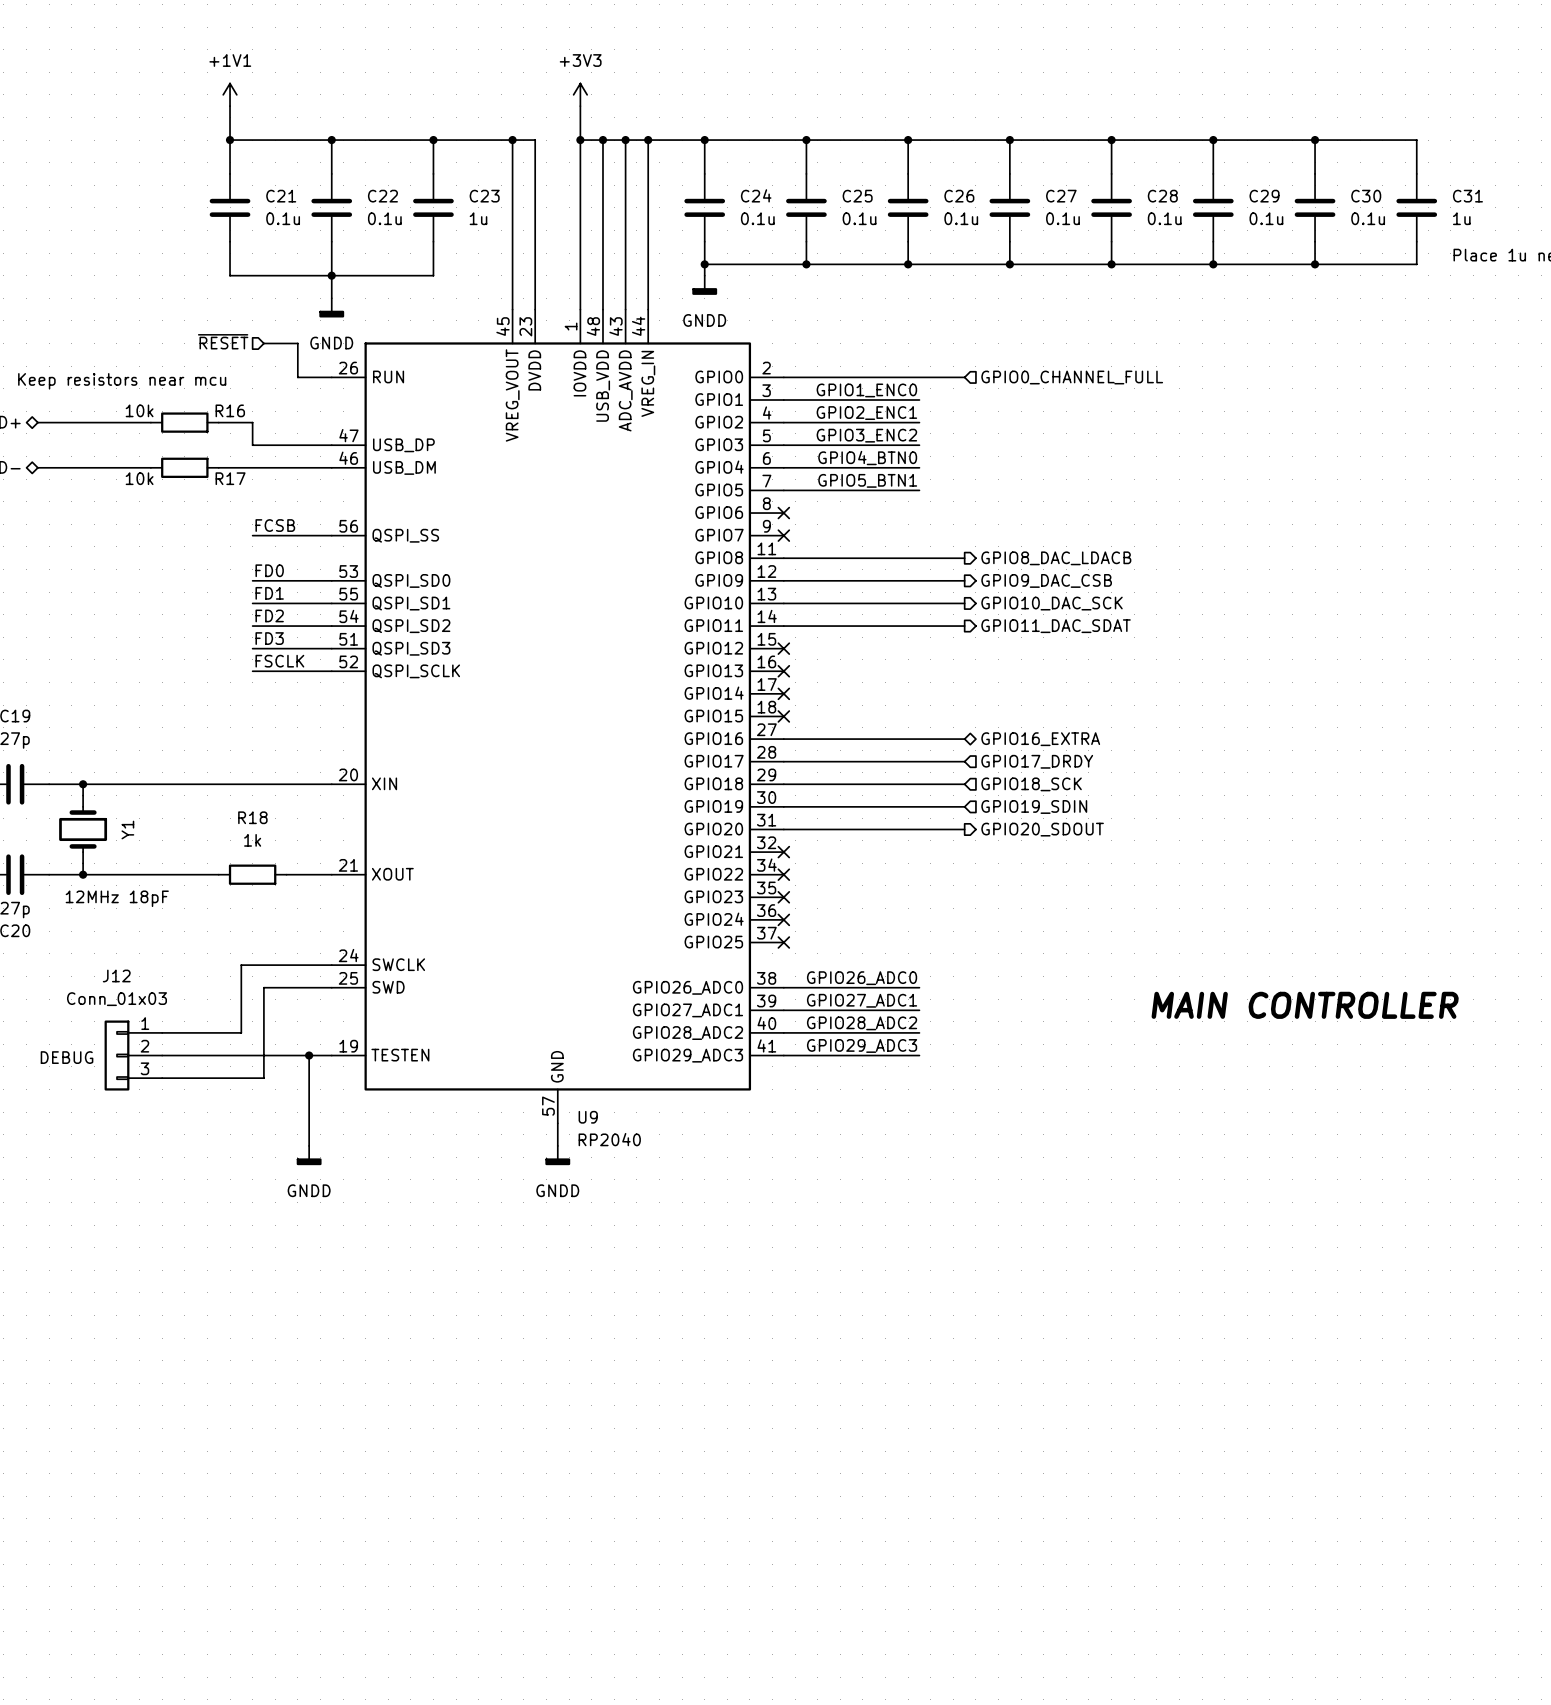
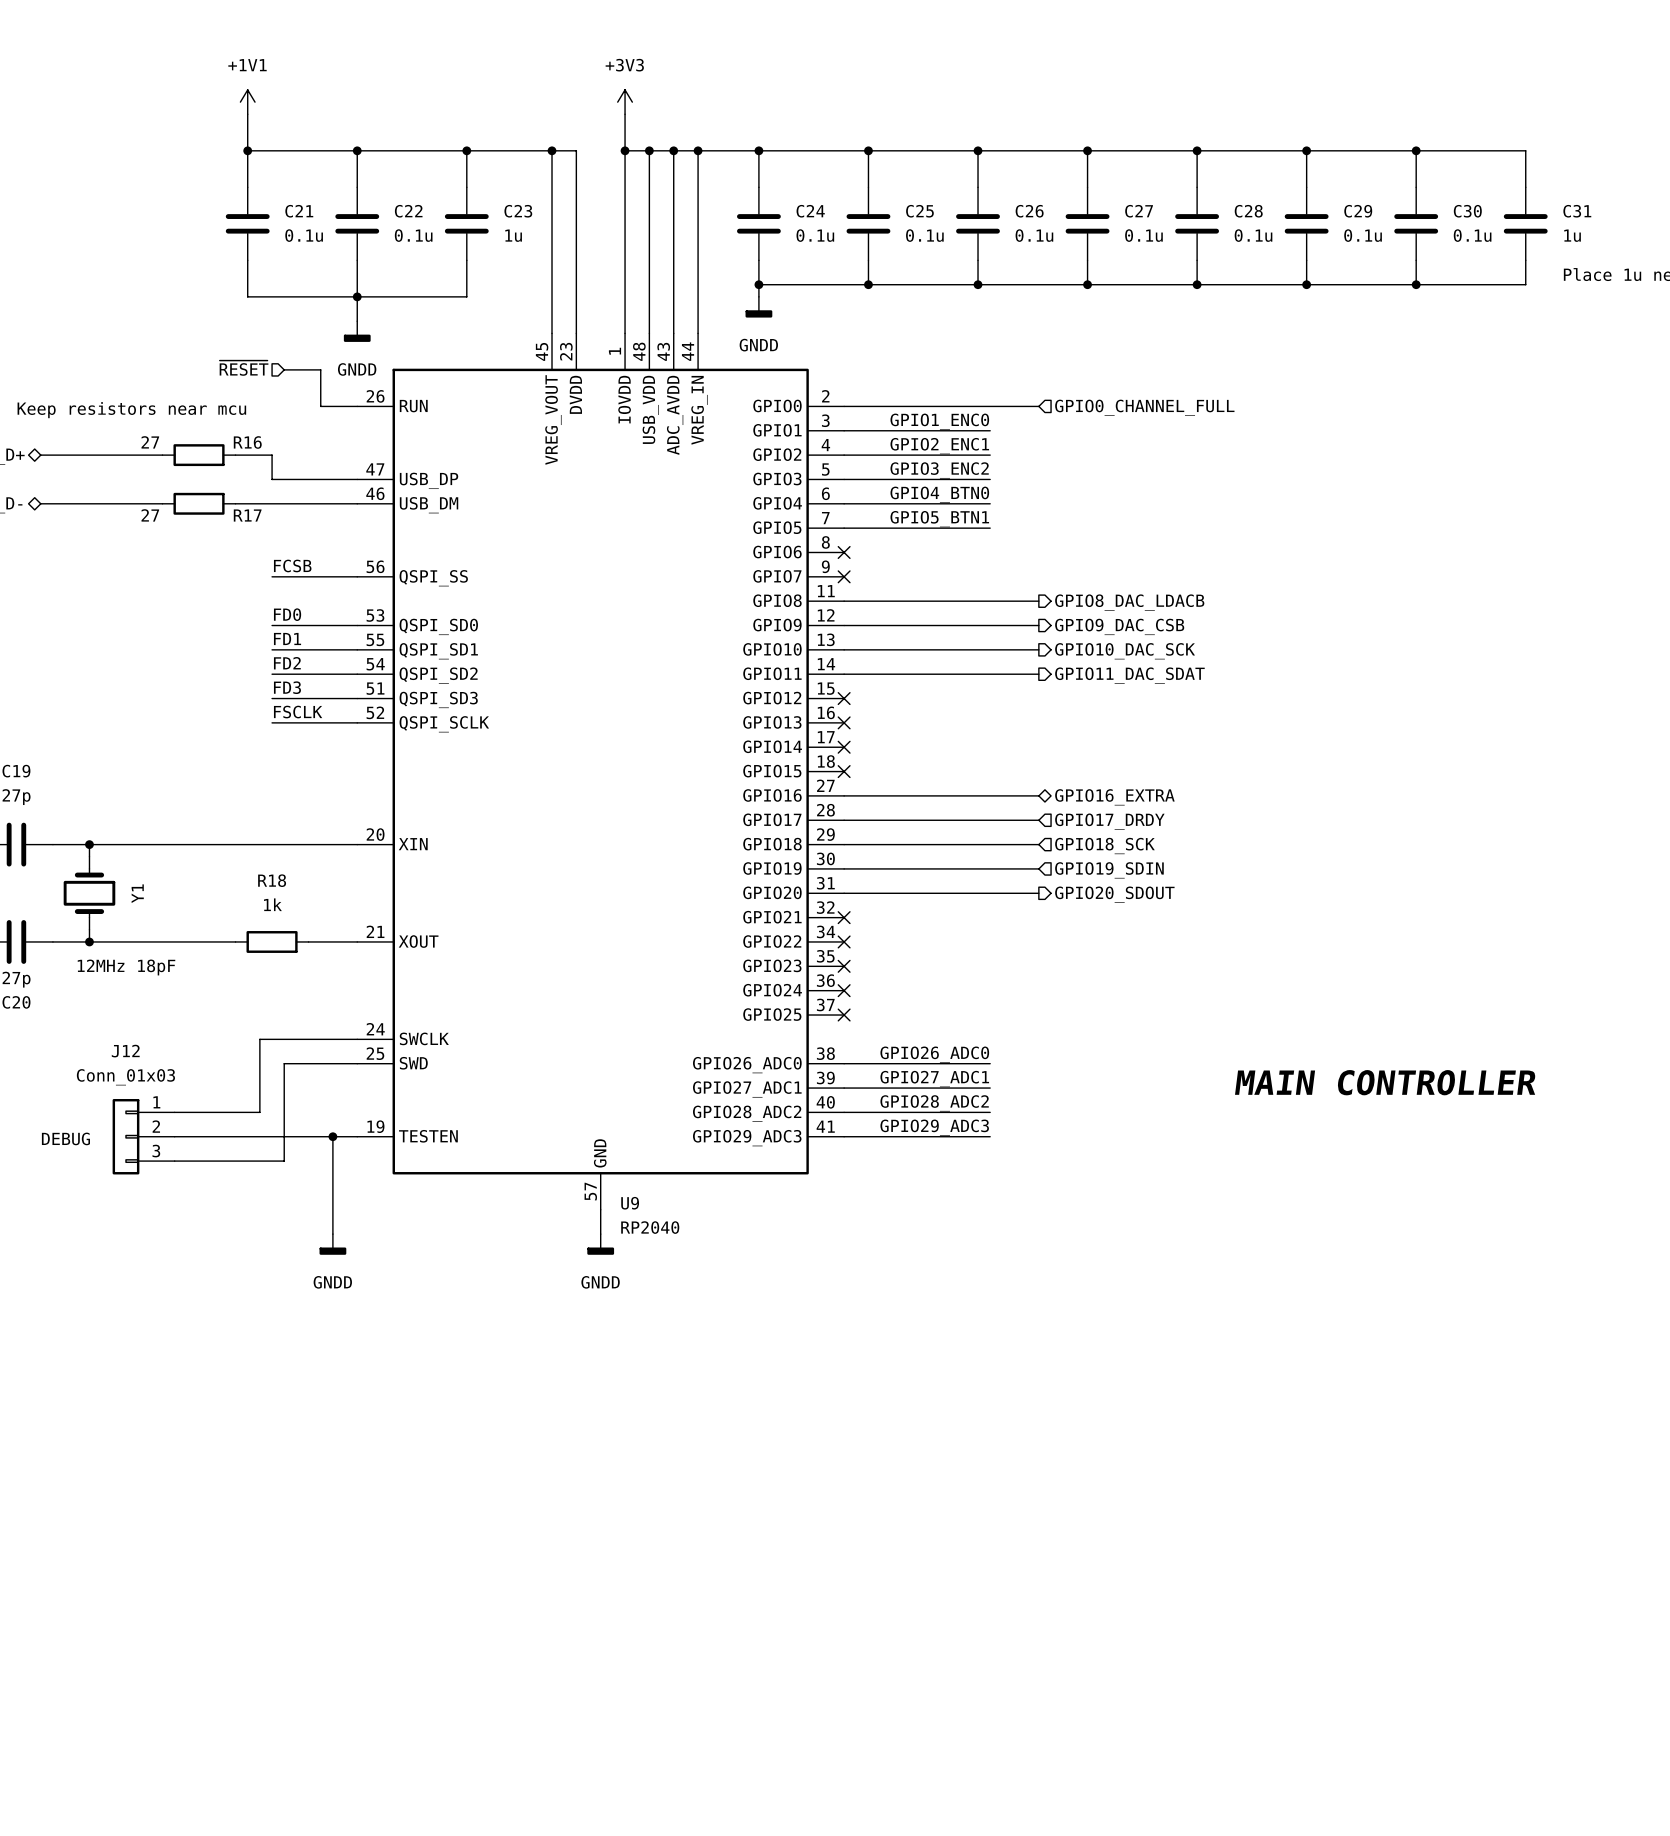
R16 value: 10k (139, 410) -> 27 (150, 442)
R17 value: 10k (139, 478) -> 27 (150, 515)

